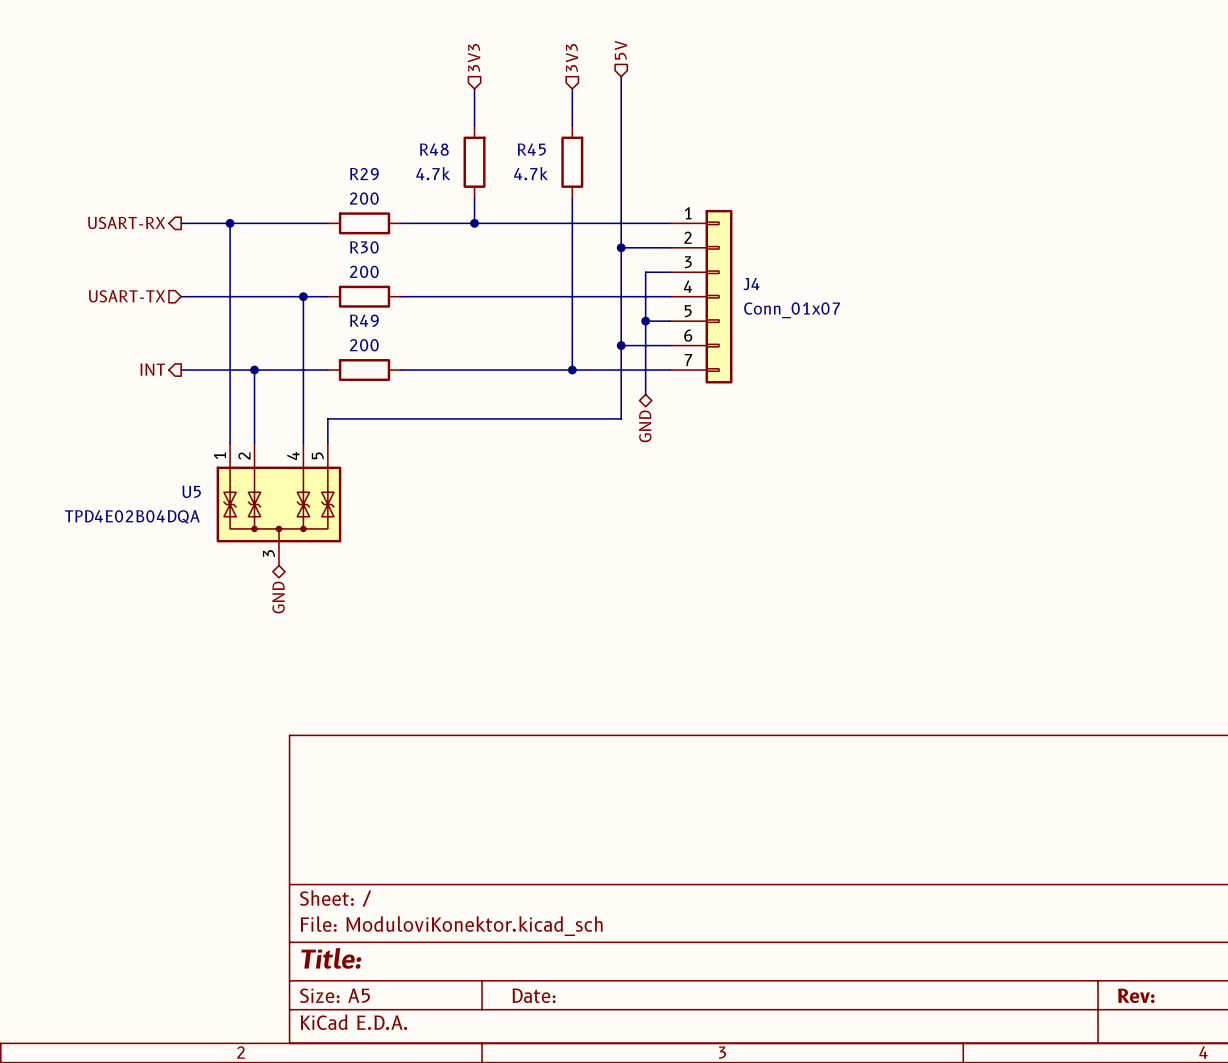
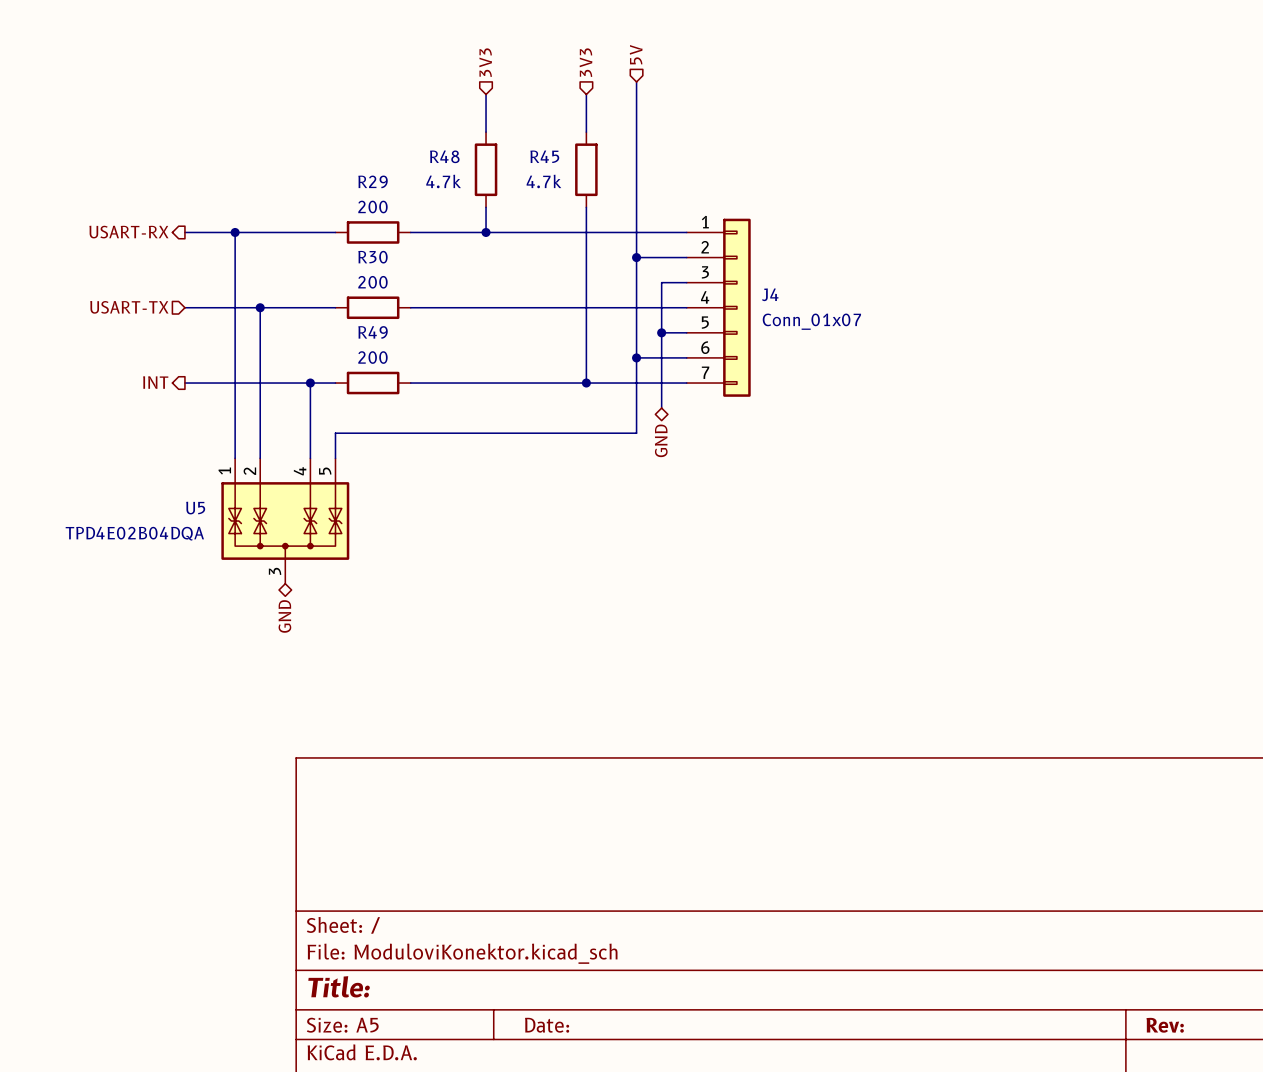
junction: none -> (260, 307)
wire: (303, 296) (303, 370) -> (260, 307) (260, 383)
junction: (303, 296) -> none
junction: (254, 370) -> none
junction: none -> (310, 383)

